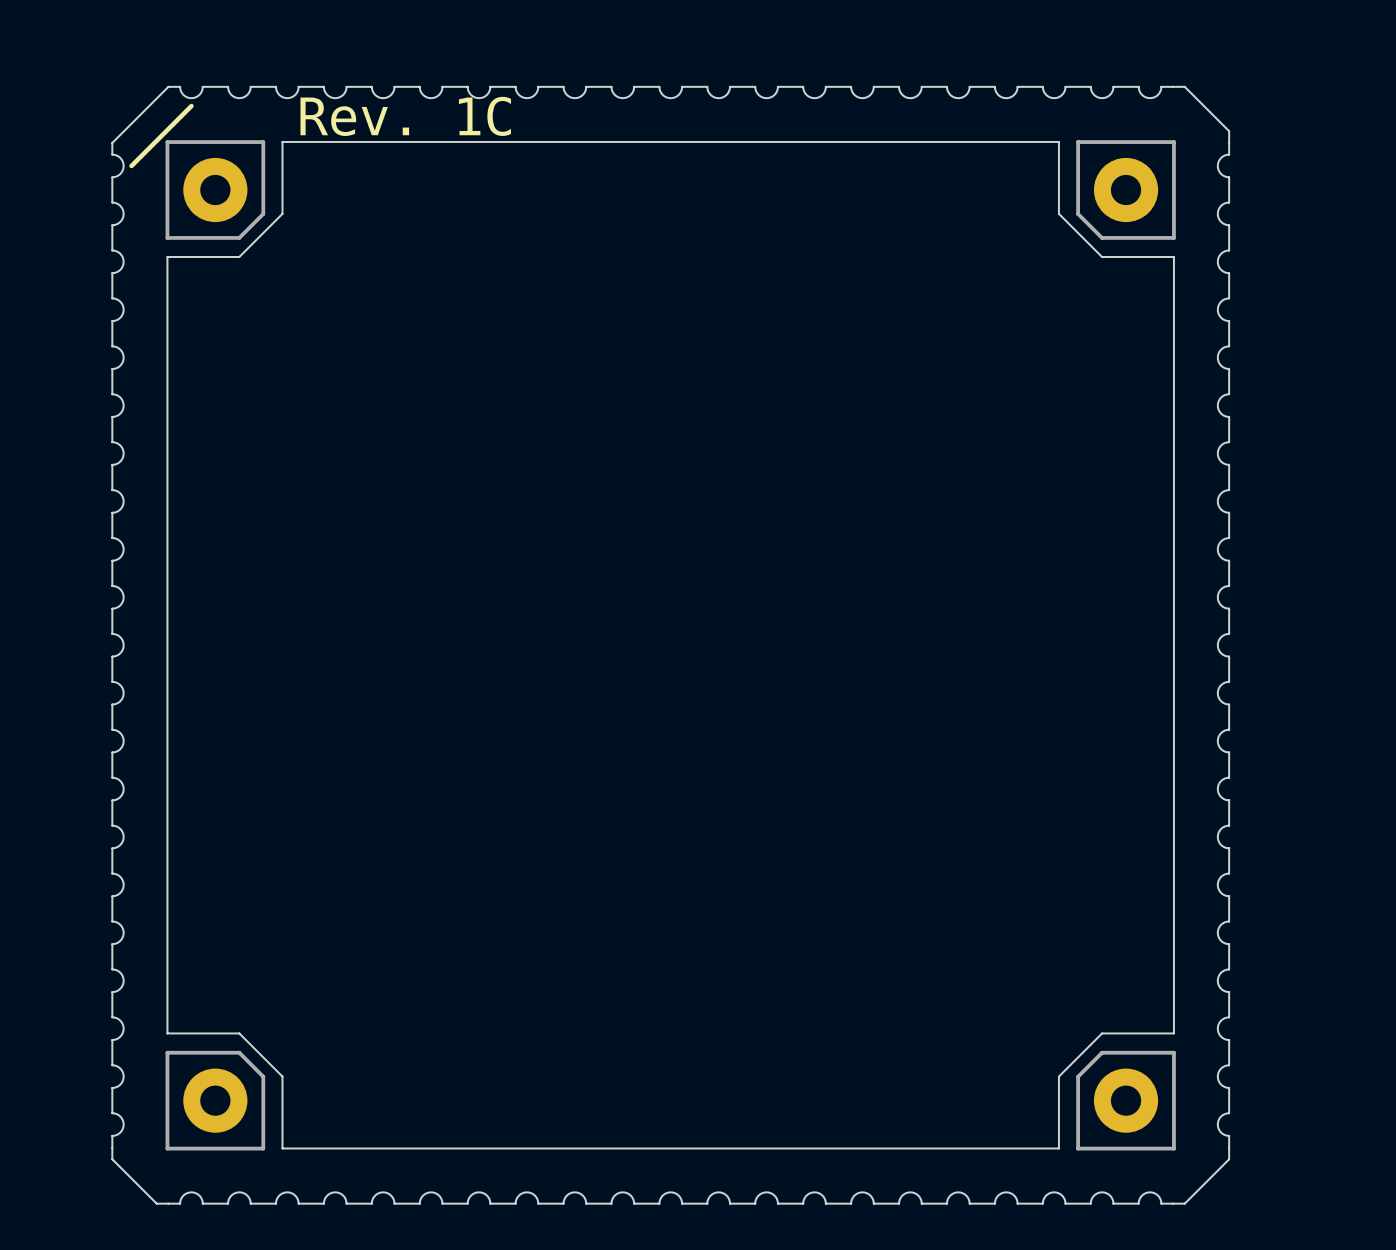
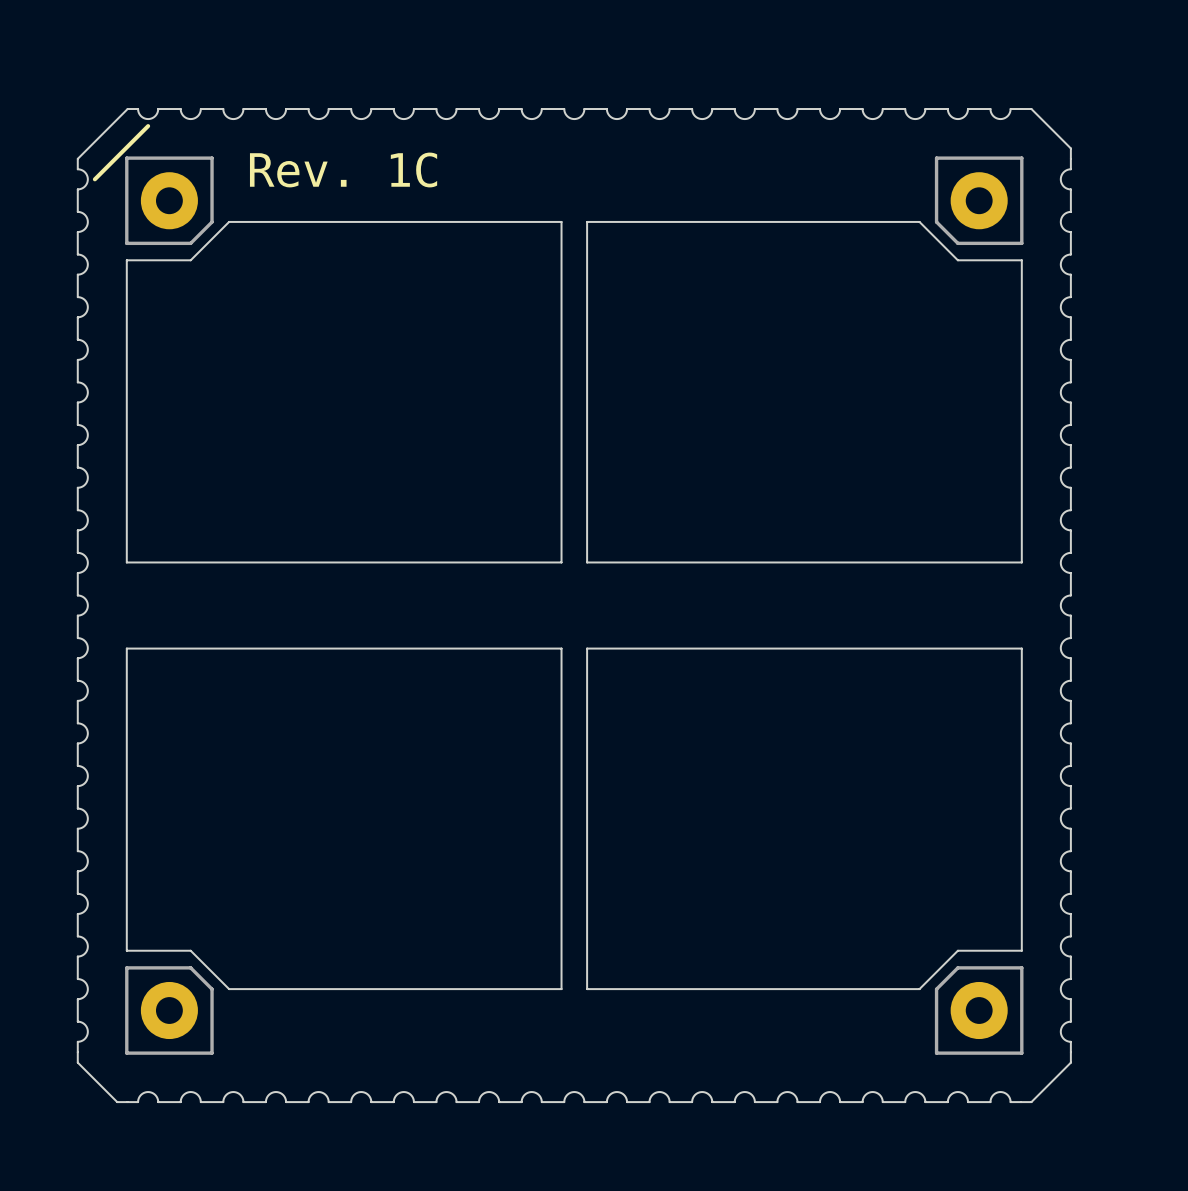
text position: Rev. 1C (405, 116) -> Rev. 1C (343, 169)
board edge: (282, 213) (282, 141) (1058, 141) (1058, 213) -> none
board edge: (167, 596) (167, 693) -> (126, 562) (561, 562) (561, 221) (229, 221)
board edge: (1173, 596) (1173, 693) -> (1021, 562) (587, 562) (587, 221) (919, 221)
board edge: none -> (1021, 648) (587, 648) (587, 989) (919, 989)
board edge: (282, 1076) (282, 1148) (1058, 1148) (1058, 1076) -> (229, 989) (561, 989) (561, 648) (126, 648)

